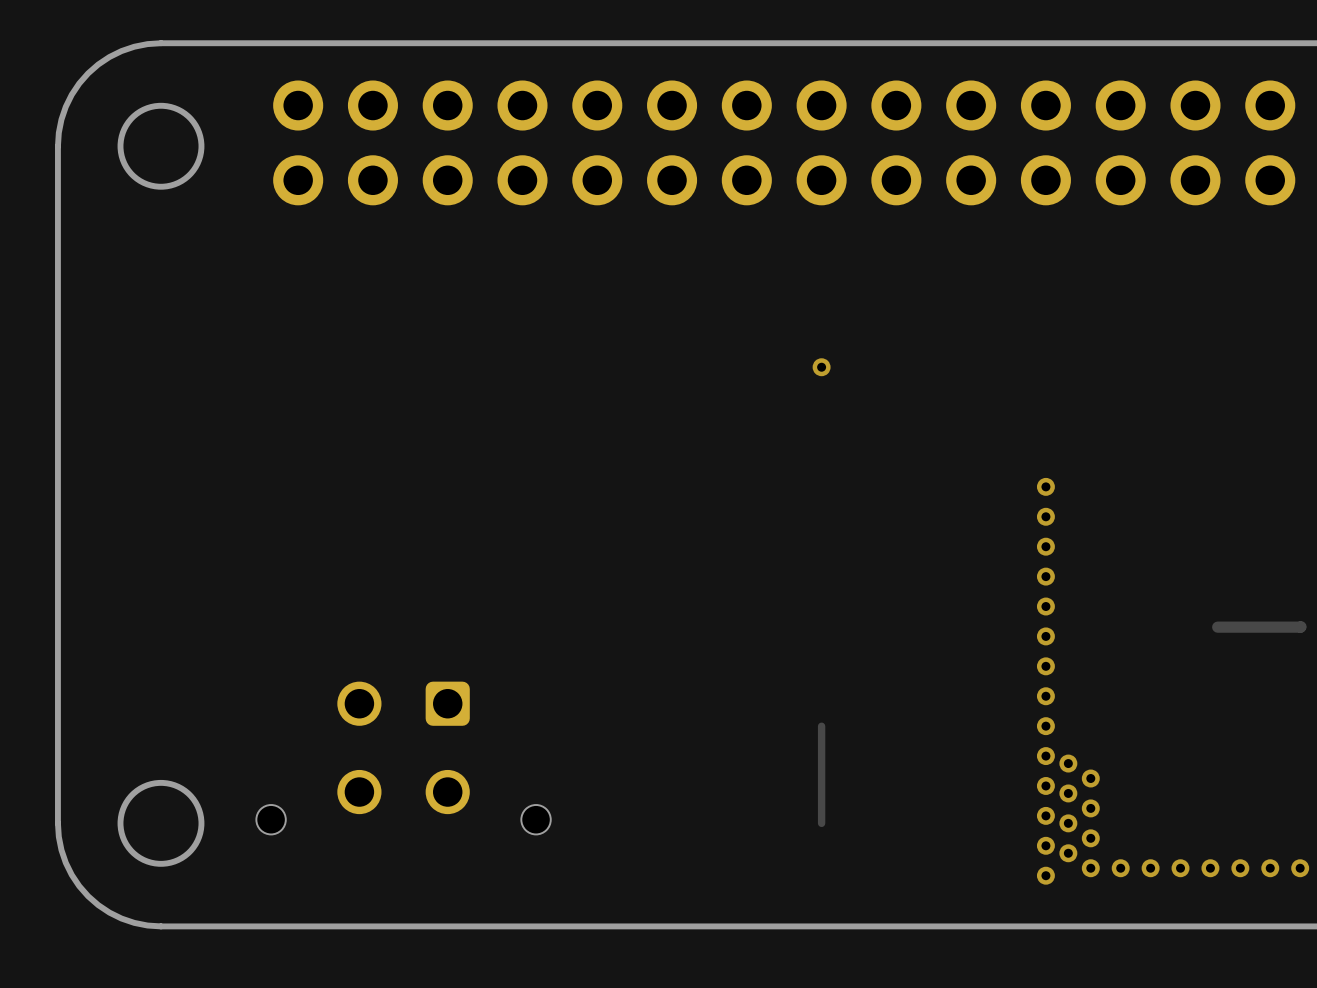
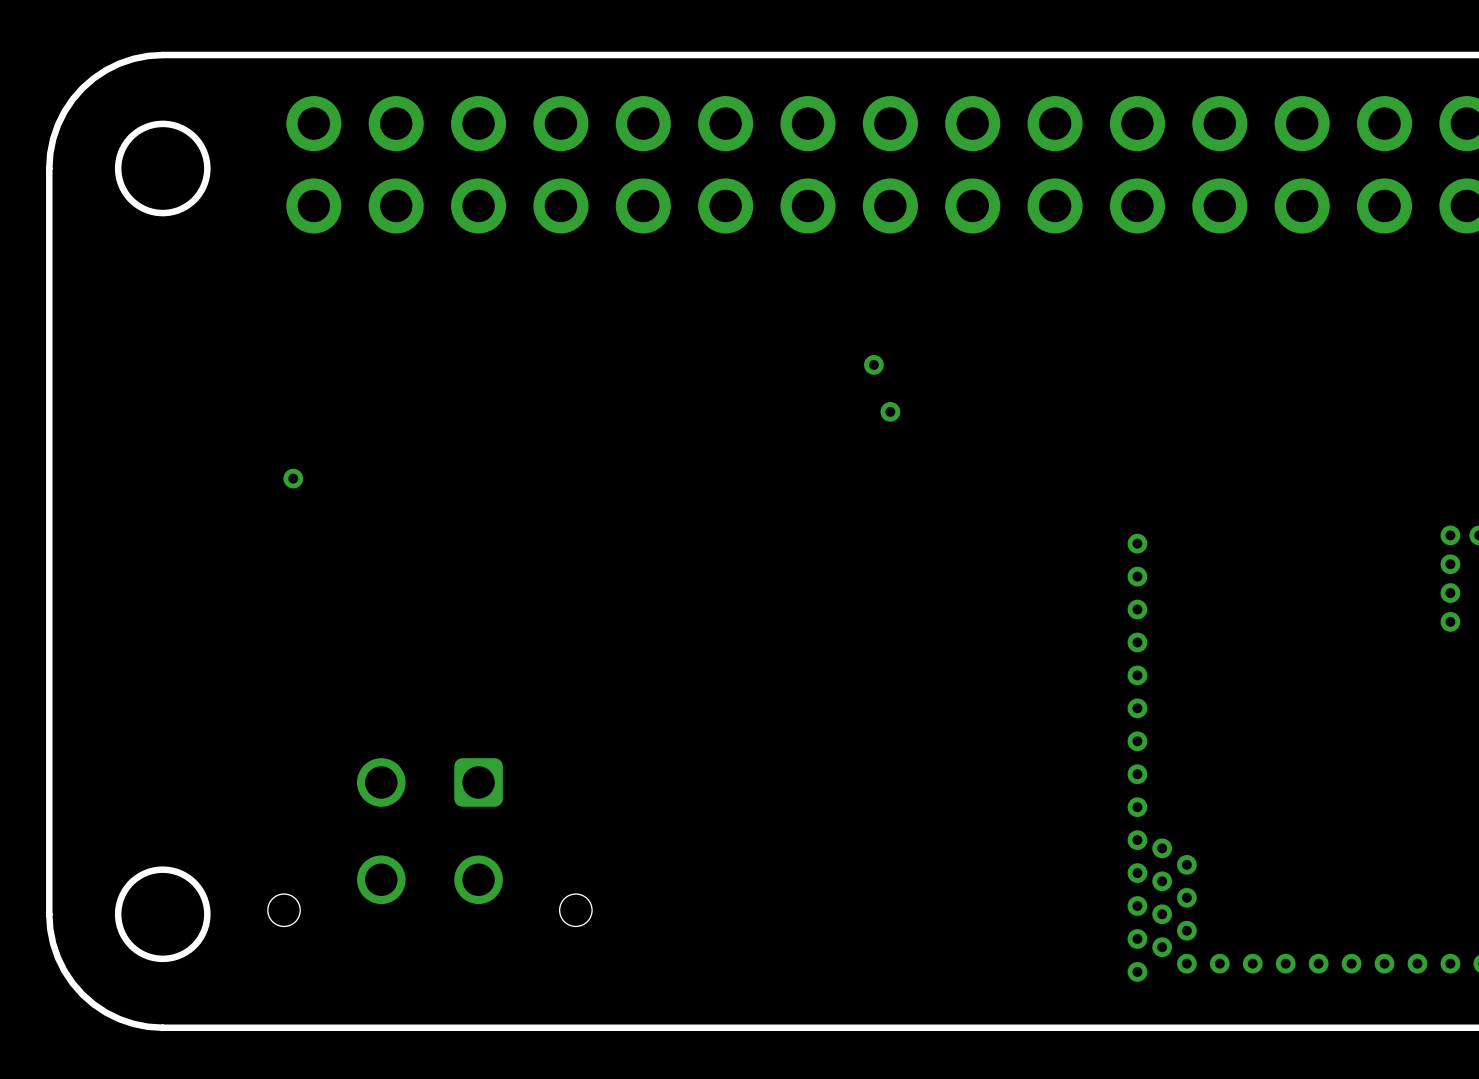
via: none -> (873, 364)
via: none -> (293, 478)
track: (1300, 627) (1217, 627) -> none
track: (821, 726) (821, 823) -> none

